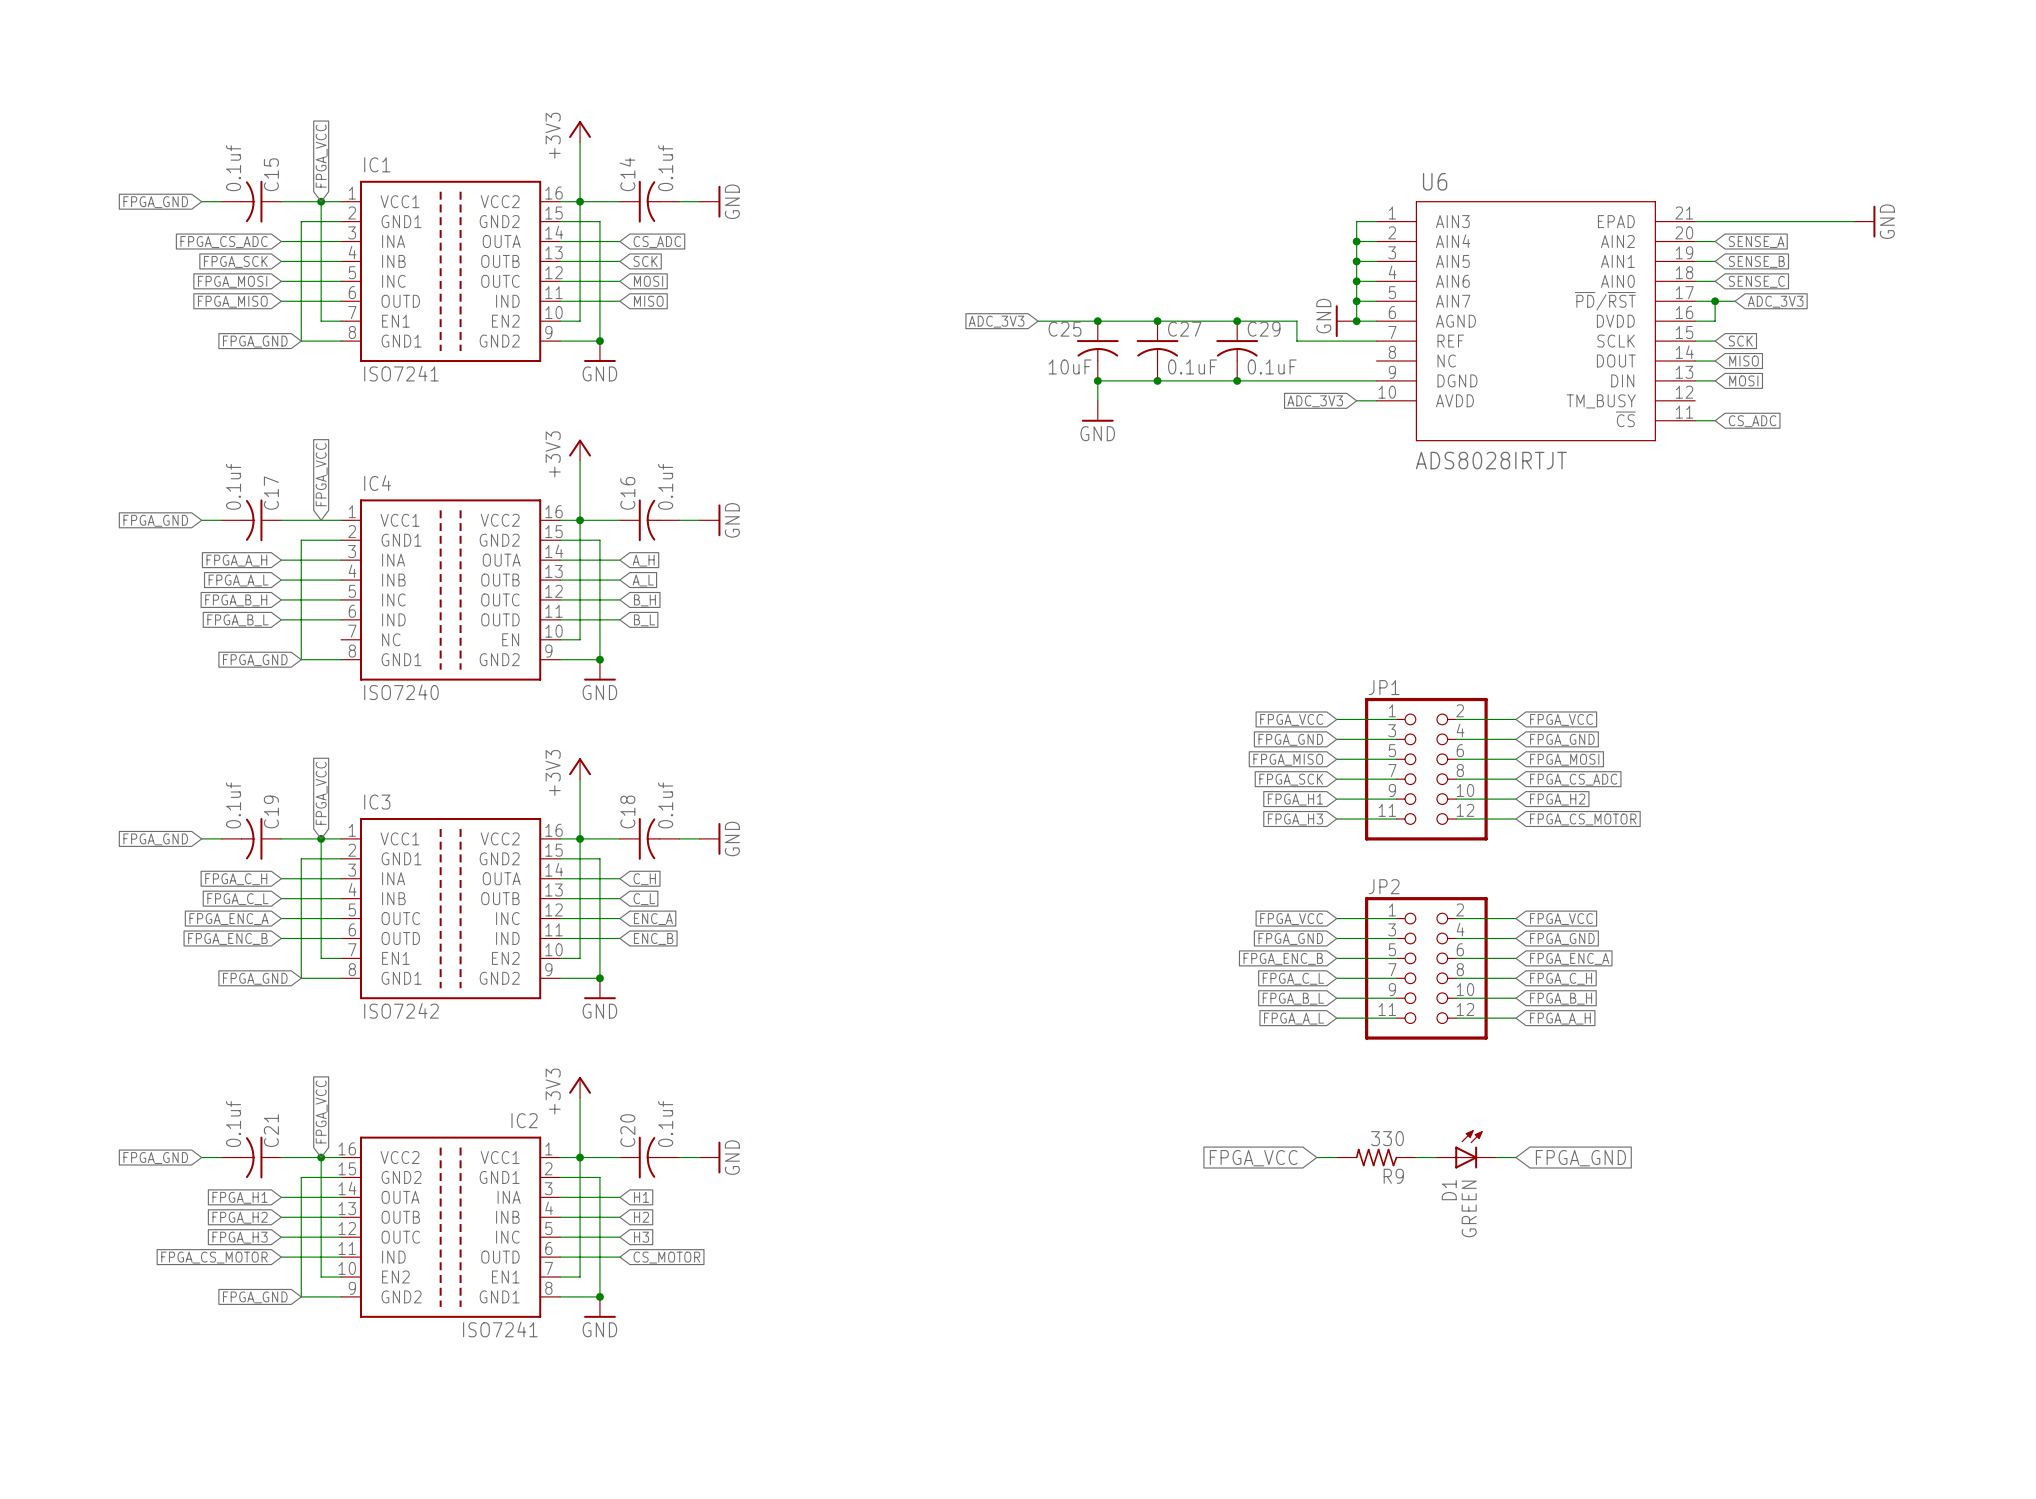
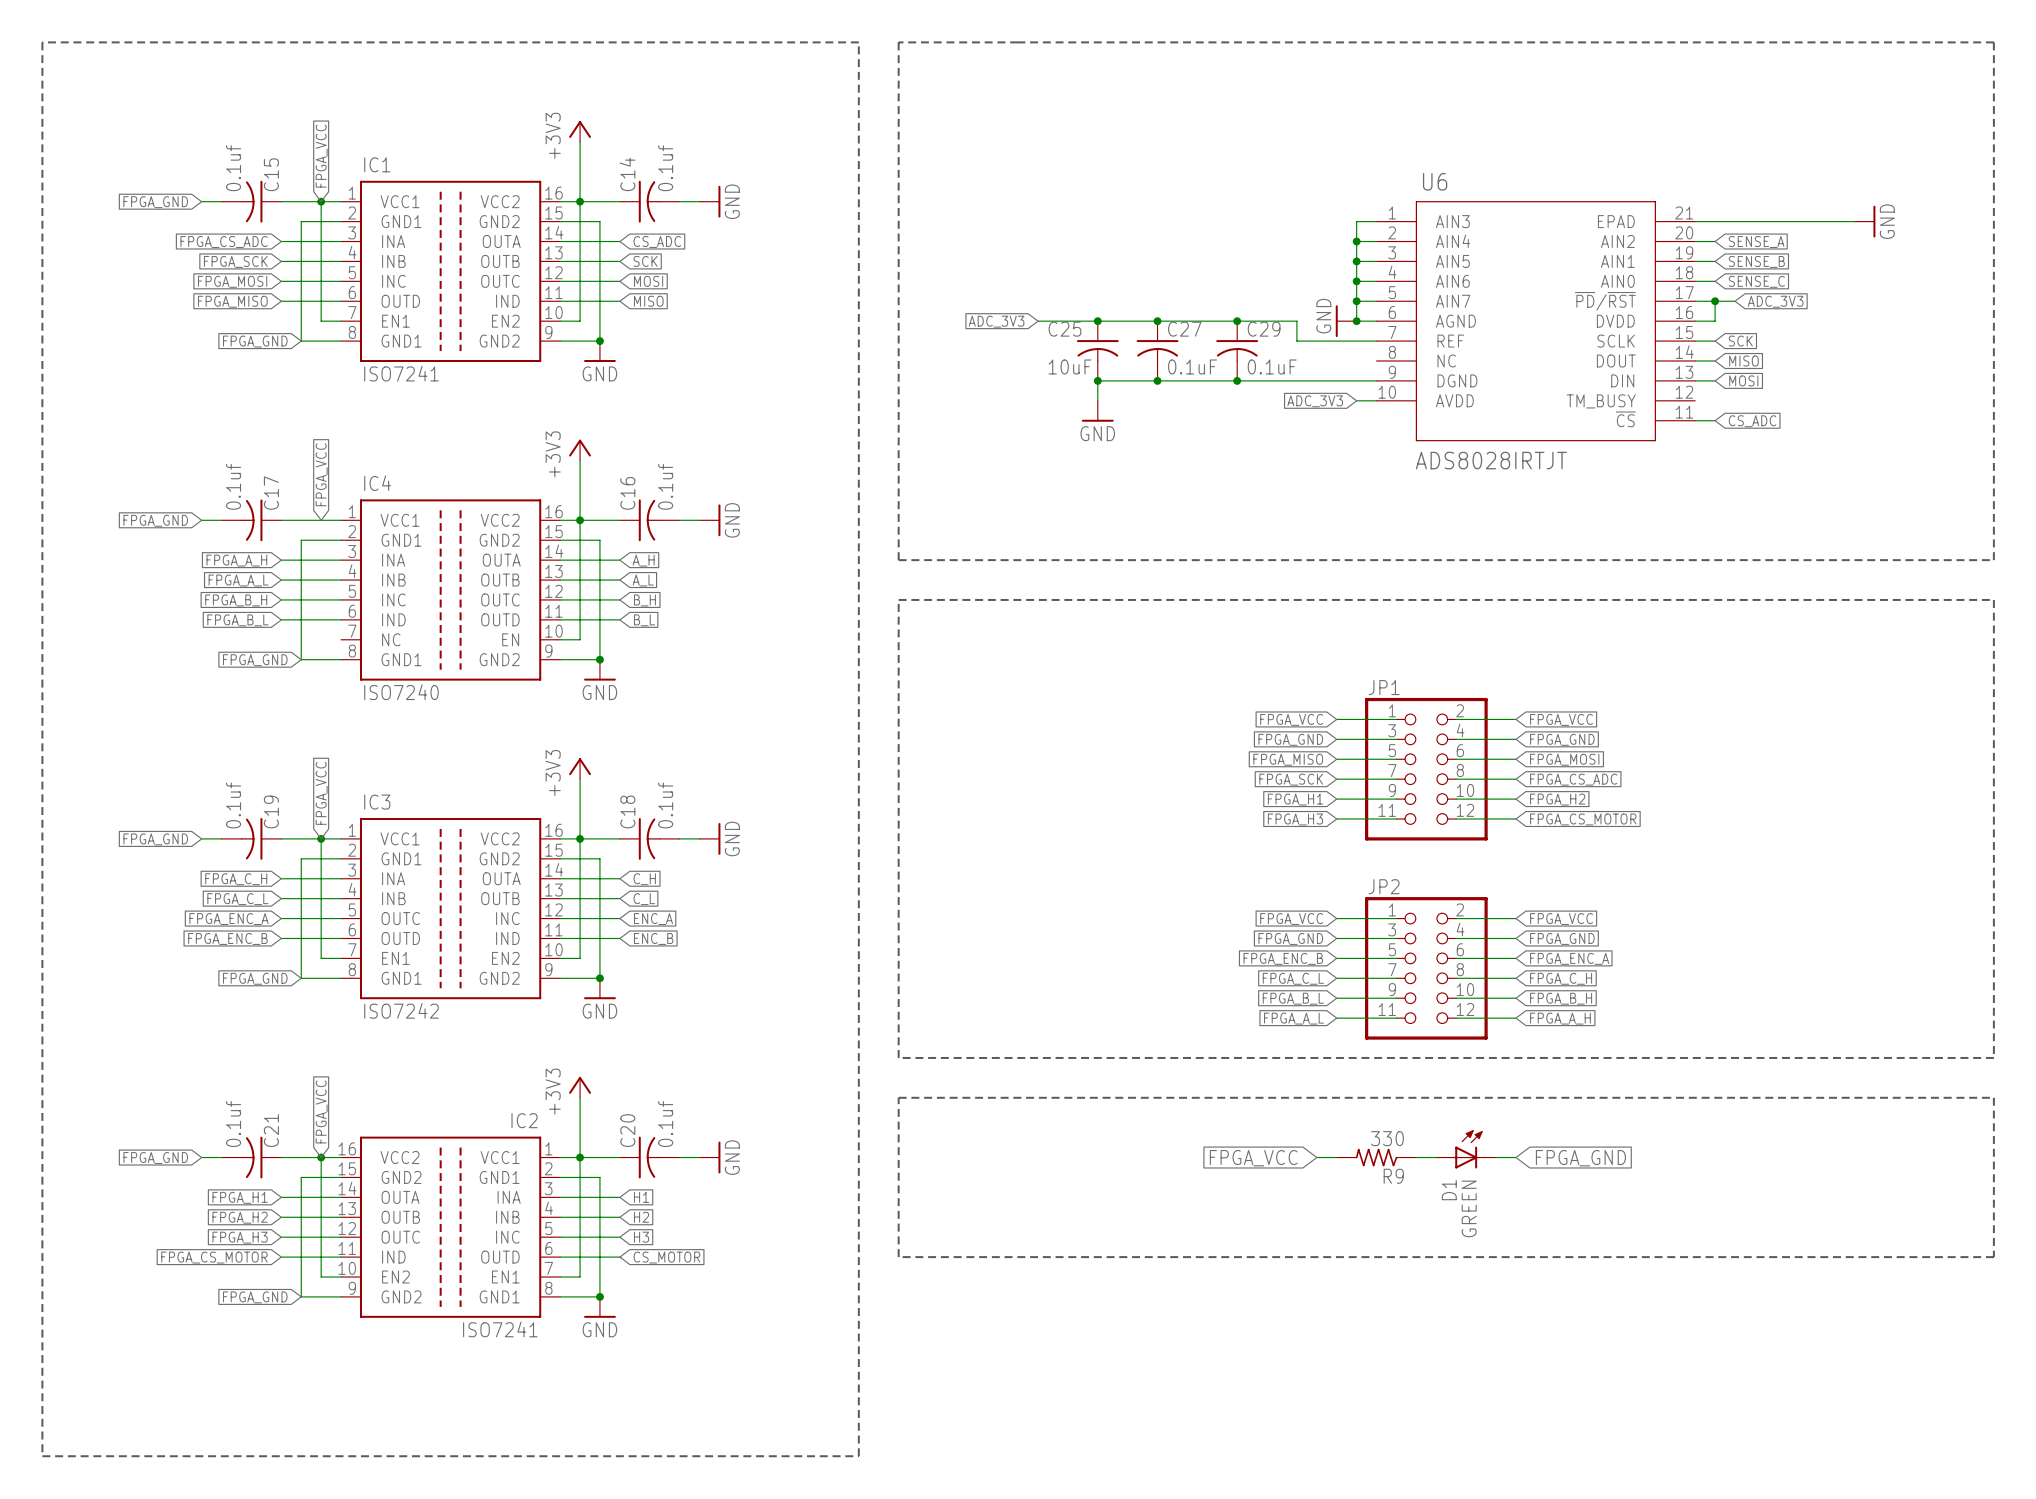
line: none -> (42, 42) (42, 1456) (858, 1456) (858, 42) (42, 42)
line: none -> (898, 42) (1993, 42) (1993, 560) (898, 560) (898, 42)
line: none -> (898, 599) (898, 1057) (1993, 1057) (1993, 599) (898, 599)
line: none -> (898, 1097) (898, 1257) (1993, 1257) (1993, 1097) (898, 1097)

